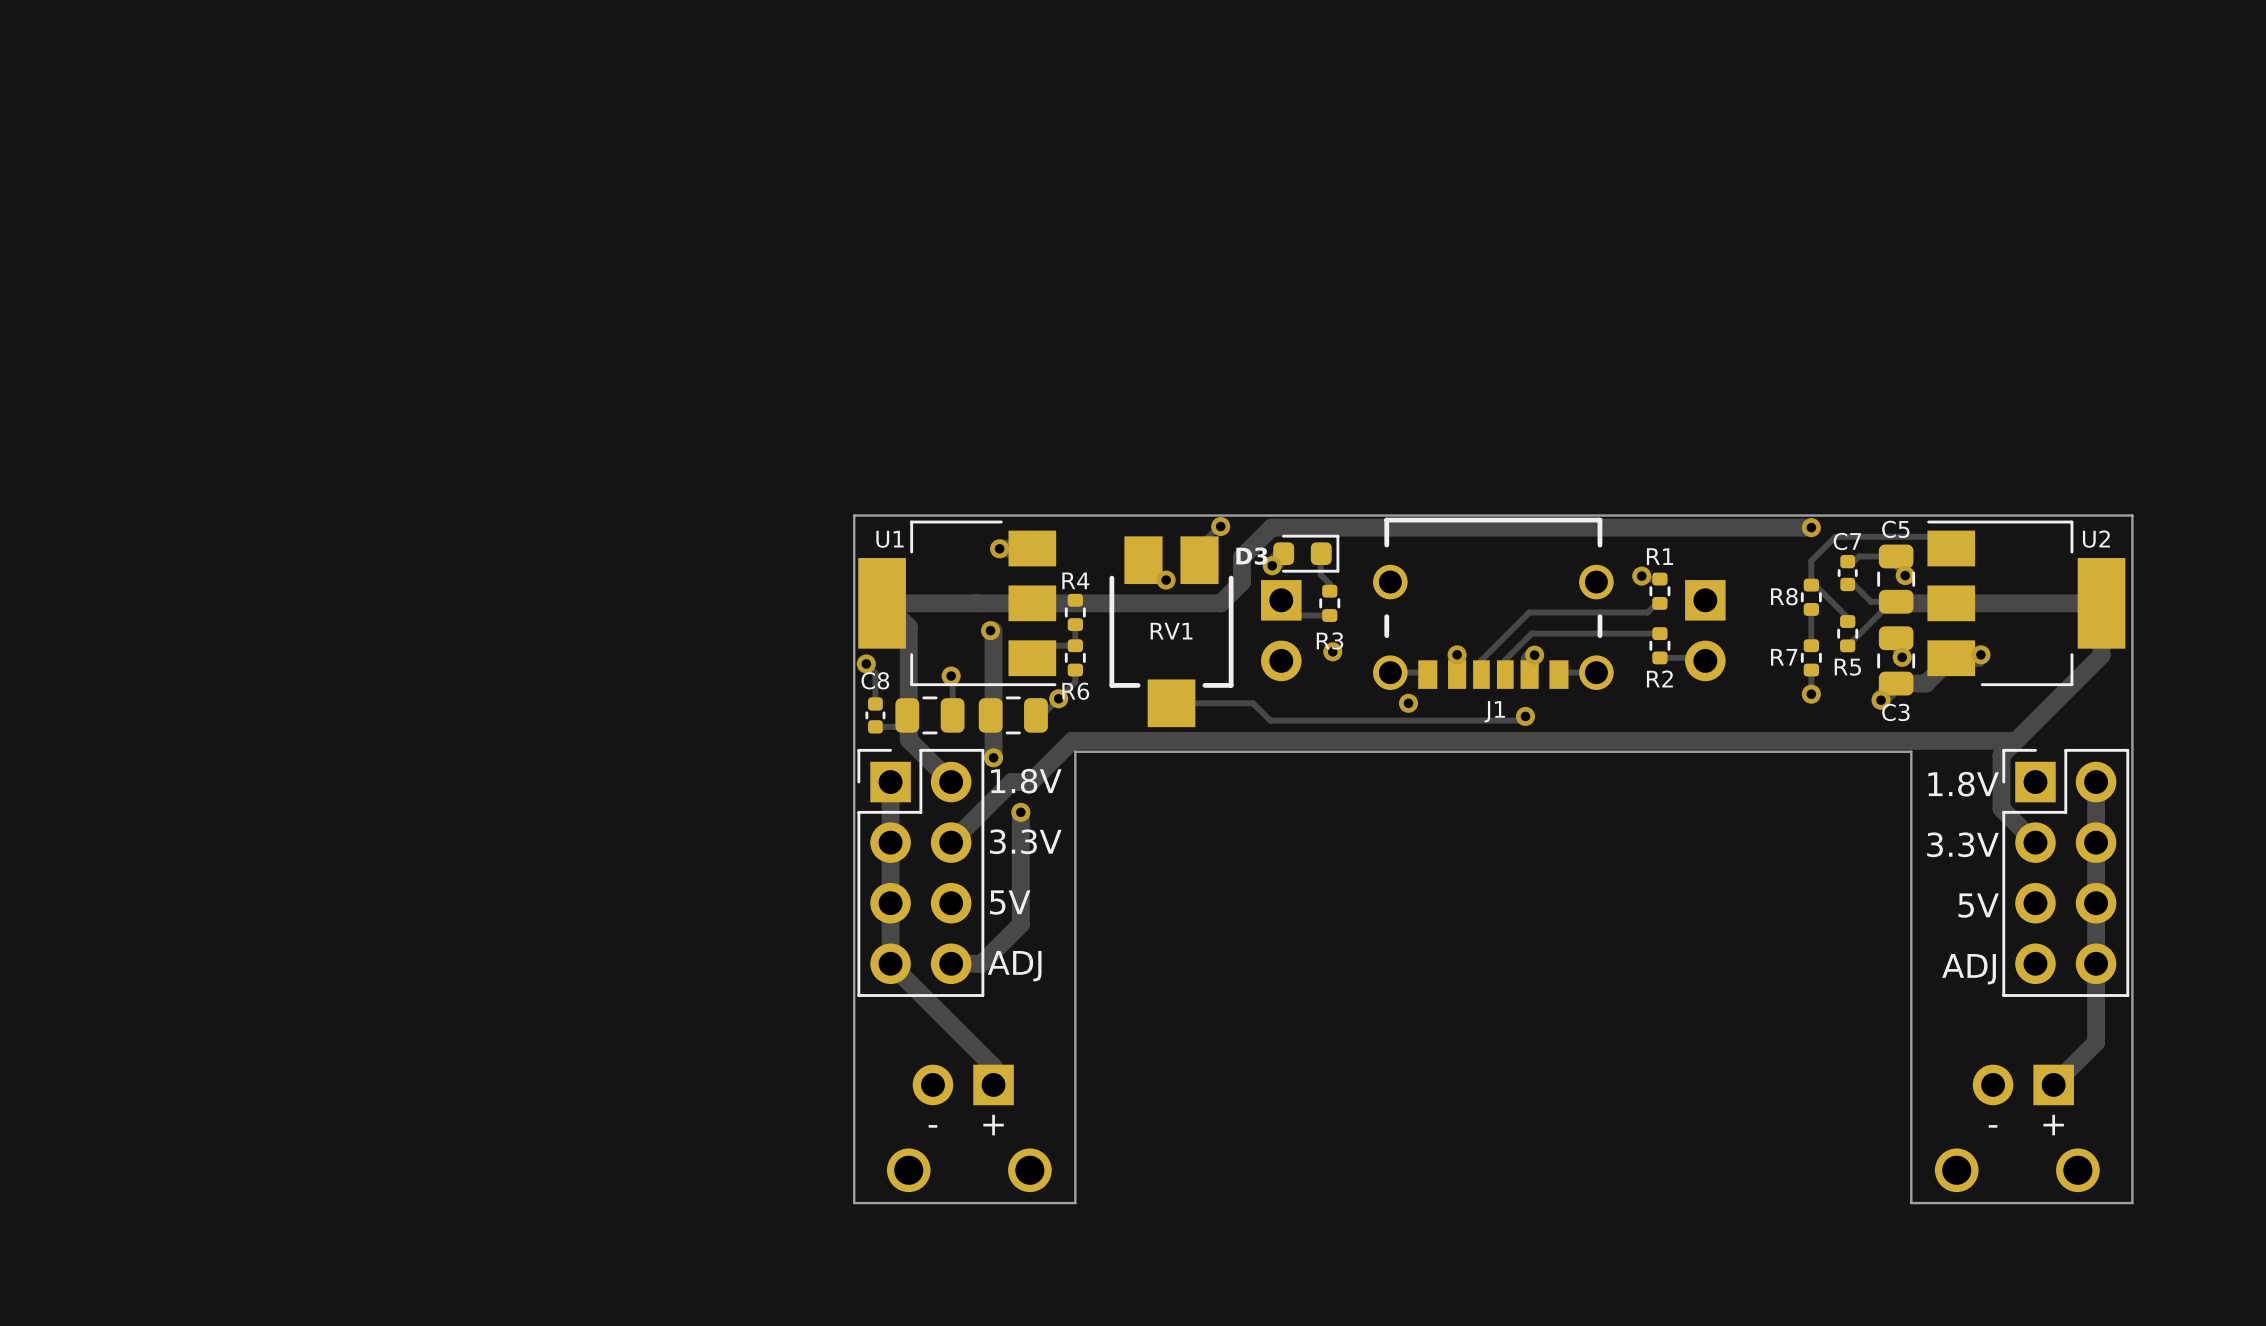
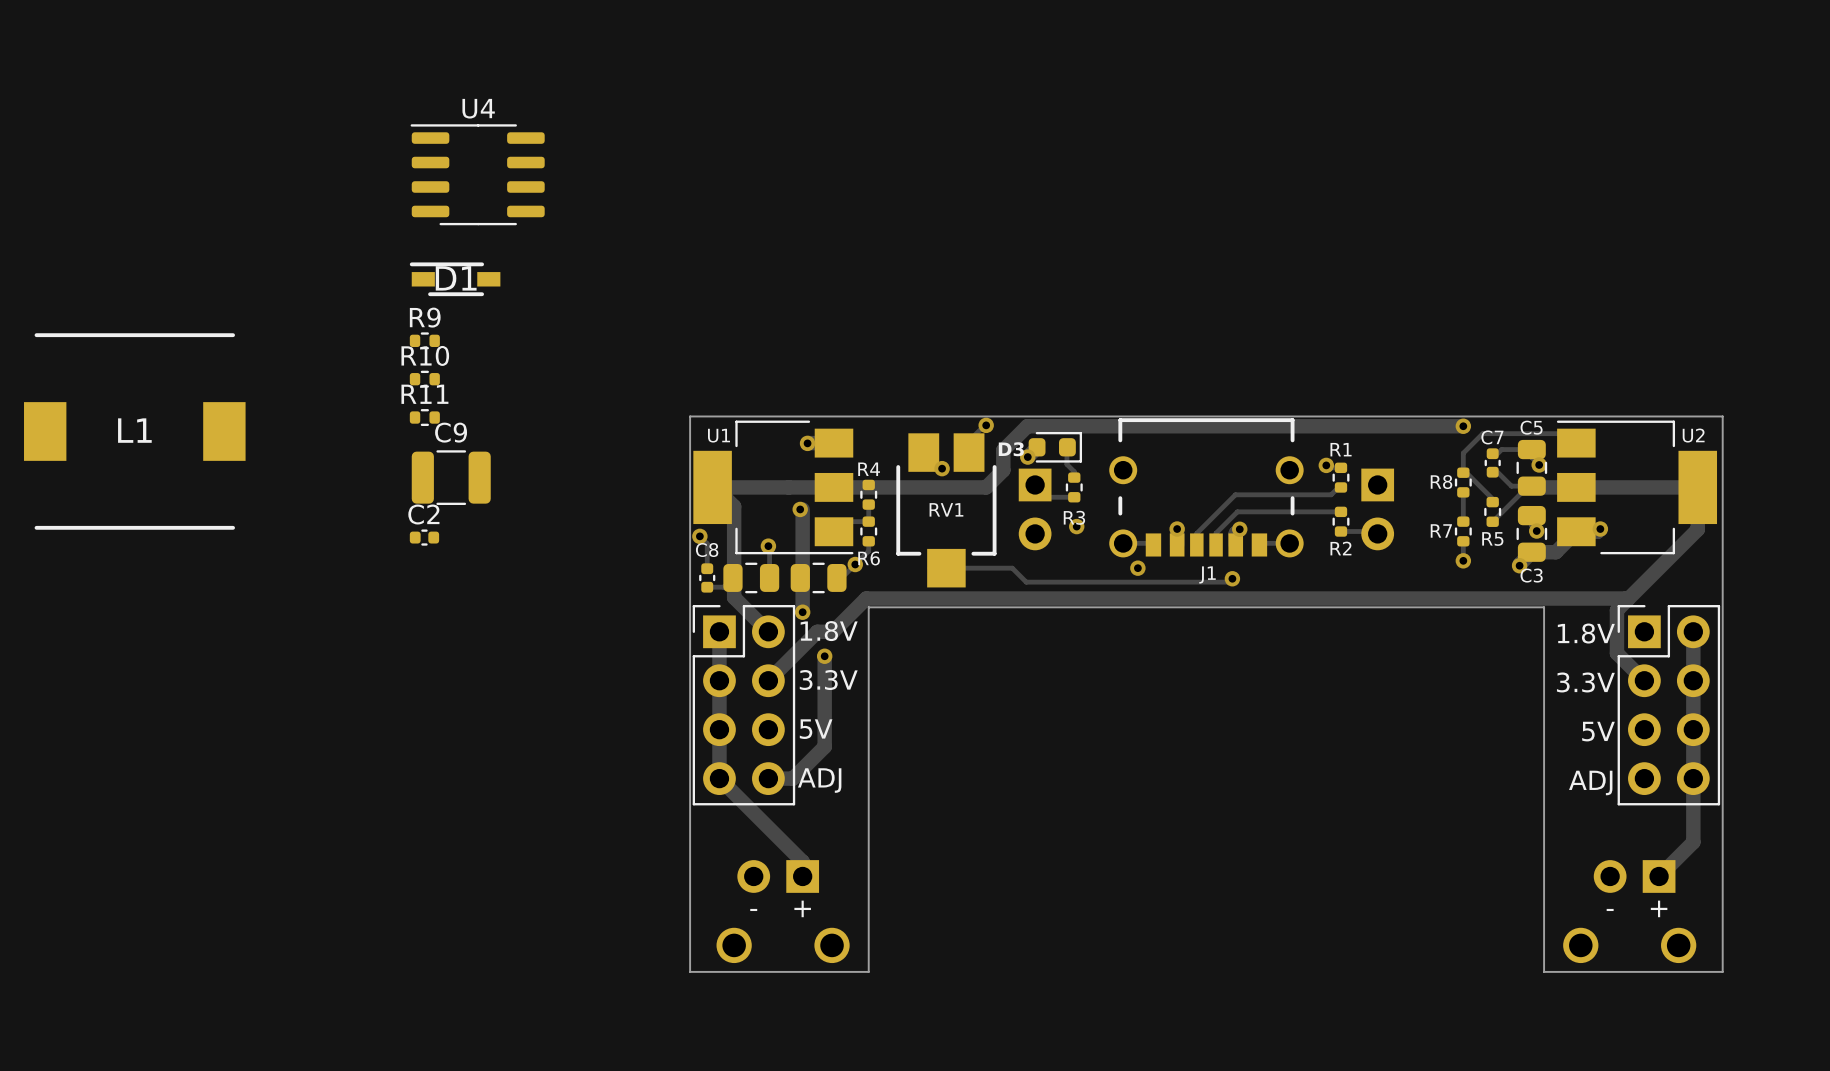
U4: none -> (477, 174)
D1: none -> (455, 279)
R9: none -> (424, 340)
R10: none -> (424, 379)
R11: none -> (424, 417)
L1: none -> (134, 431)
C9: none -> (451, 477)
C2: none -> (424, 537)

